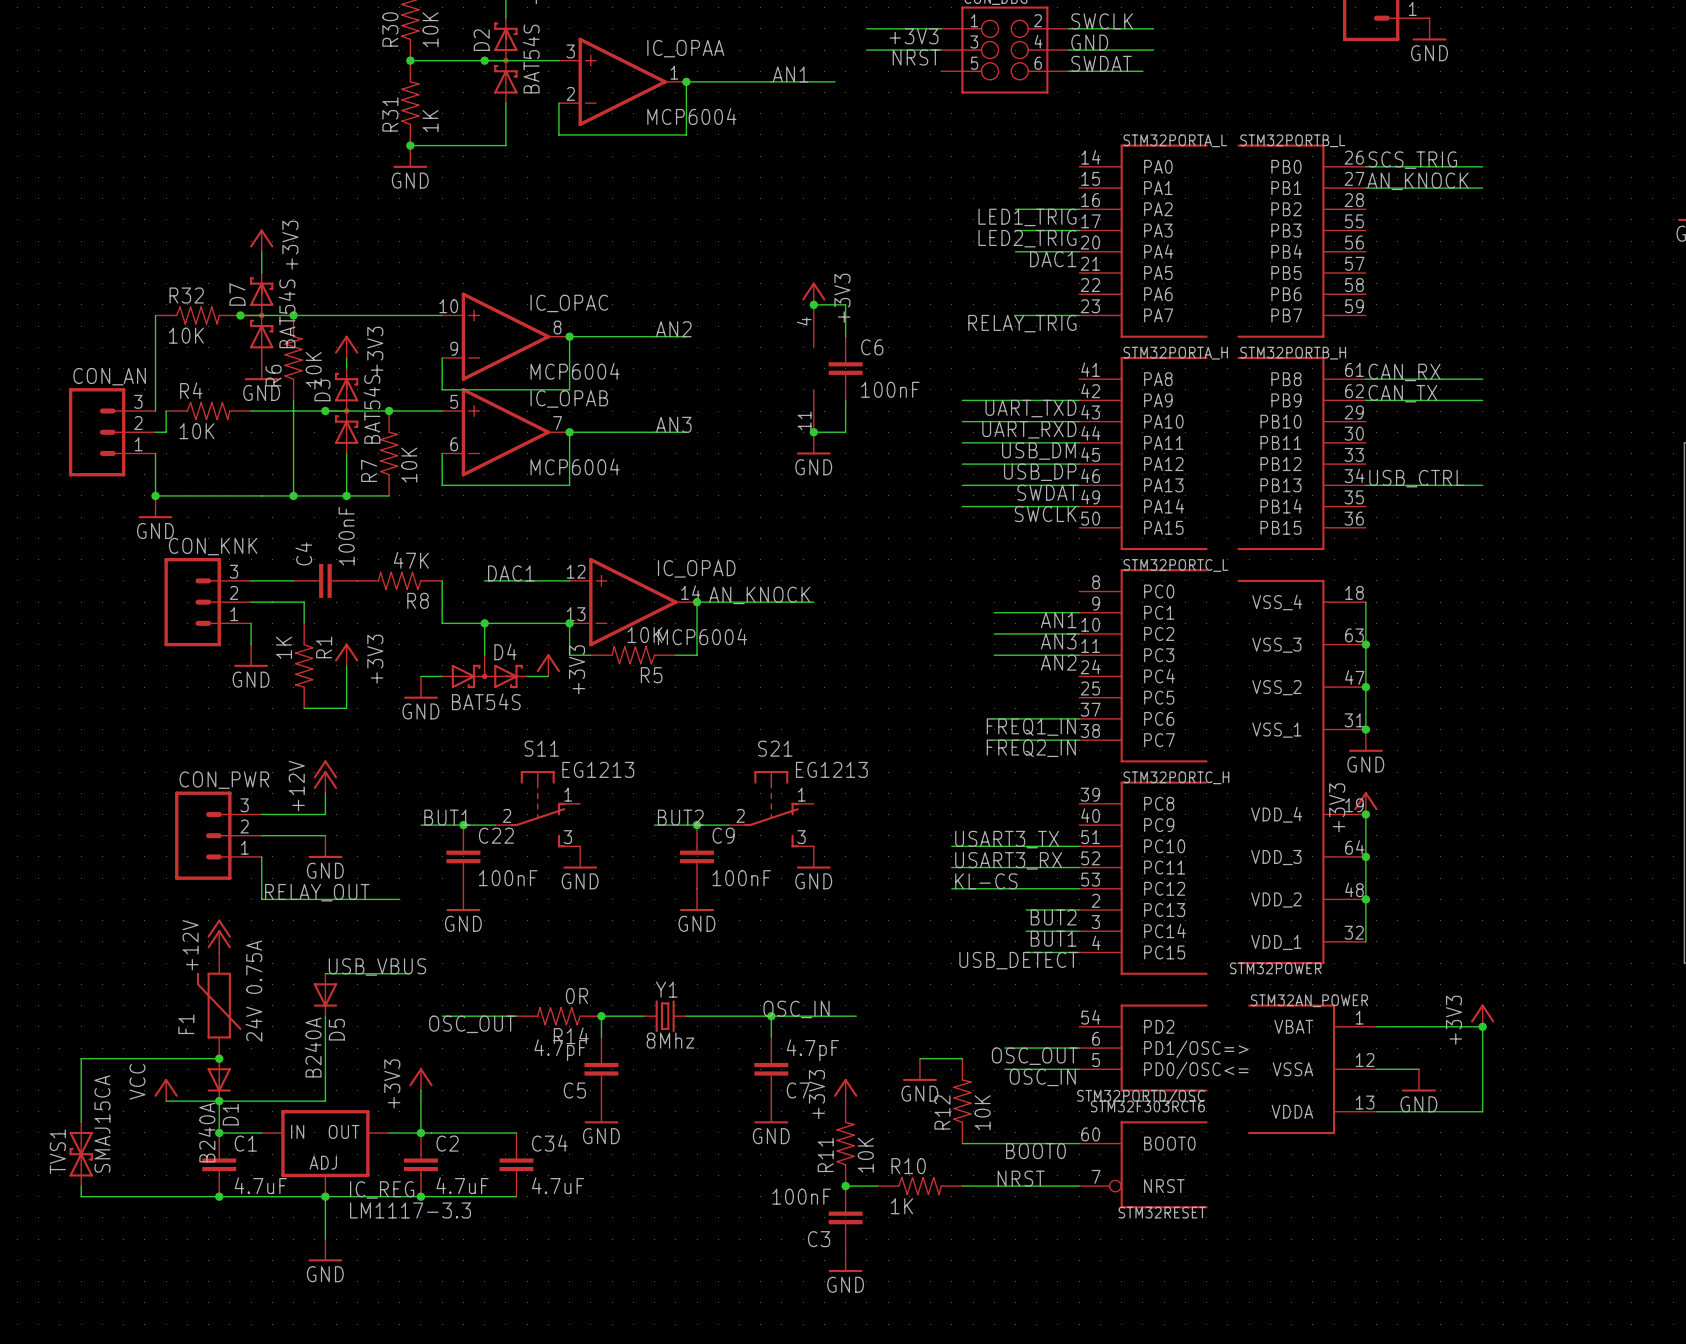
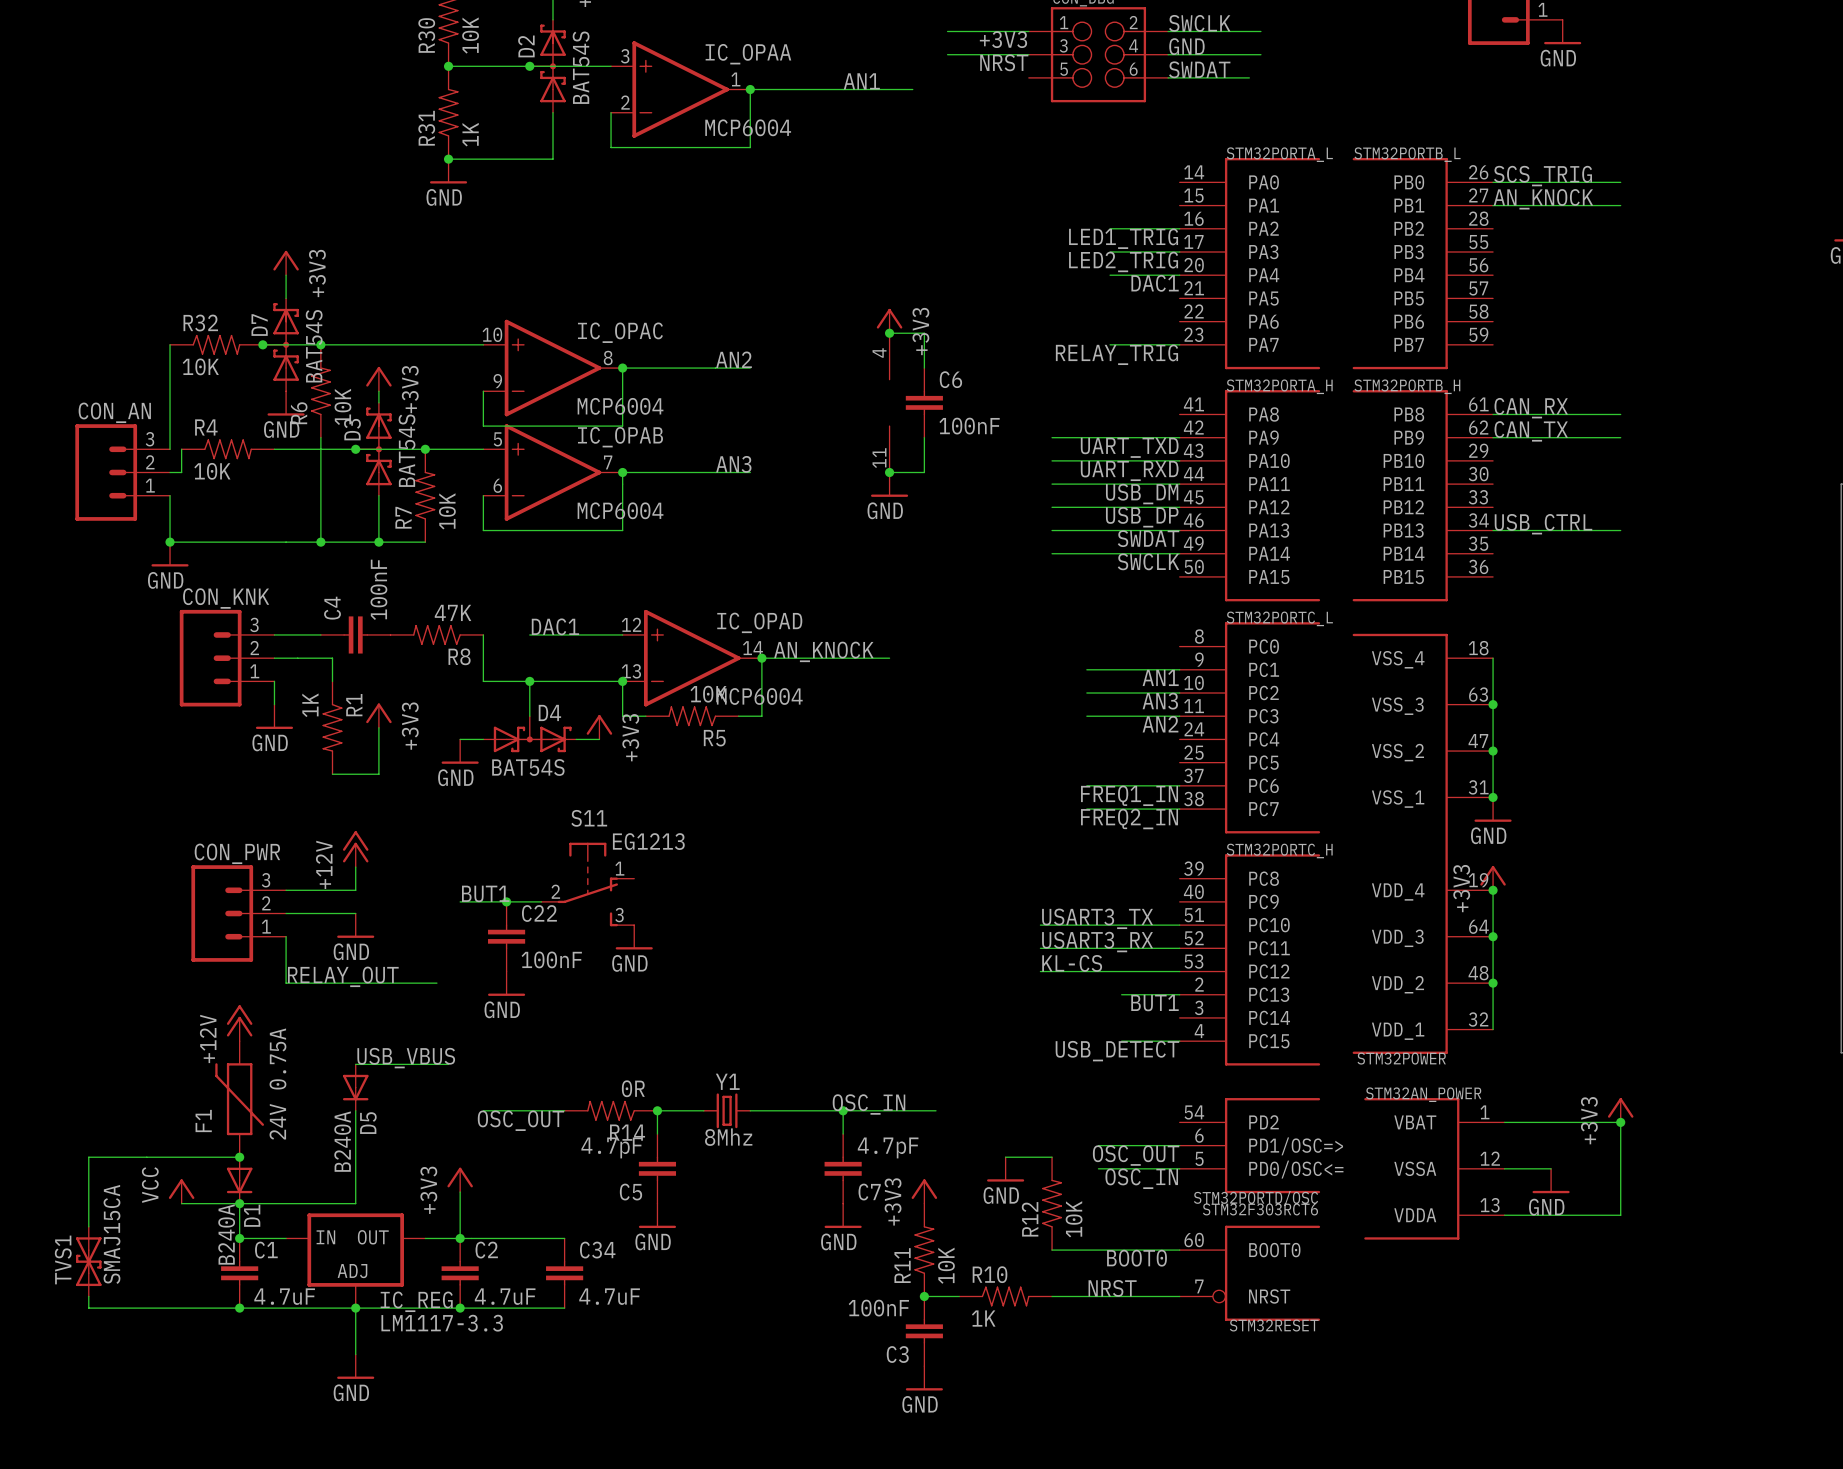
S21: EG1213 (771, 809) -> none
label: BUT2 (680, 817) -> none
wire: (654, 825) (728, 825) -> none
junction: (697, 825) -> none
C9: 100nF (697, 856) -> none
power symbol: GND (813, 857) -> none
power symbol: GND (697, 899) -> none
label: BUT2 (1053, 917) -> BUT1 (1154, 1003)
wire: (1026, 931) (1079, 931) -> none
label: BUT1 (1053, 938) -> none

